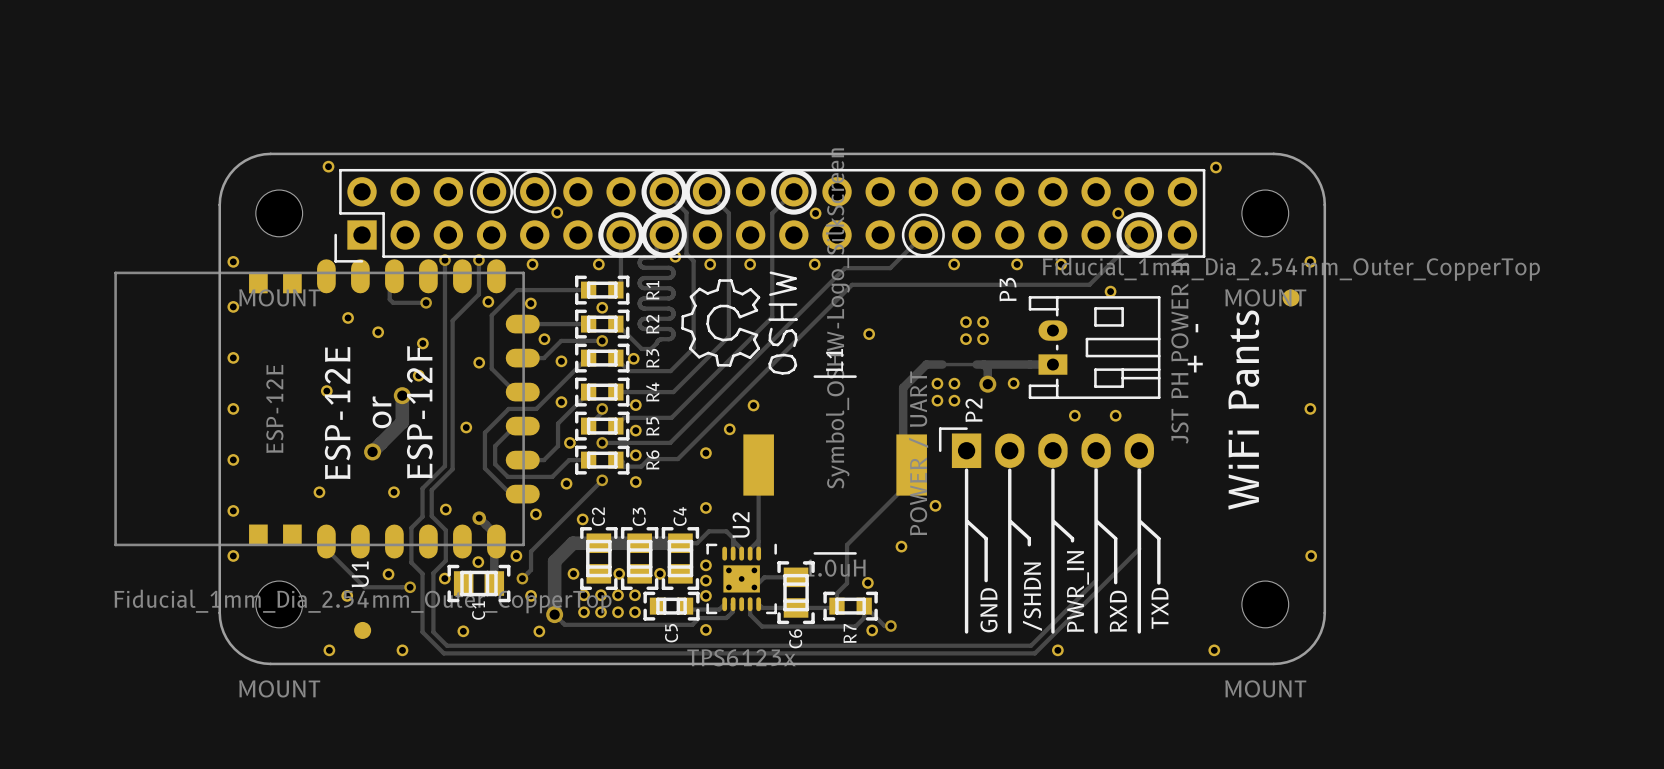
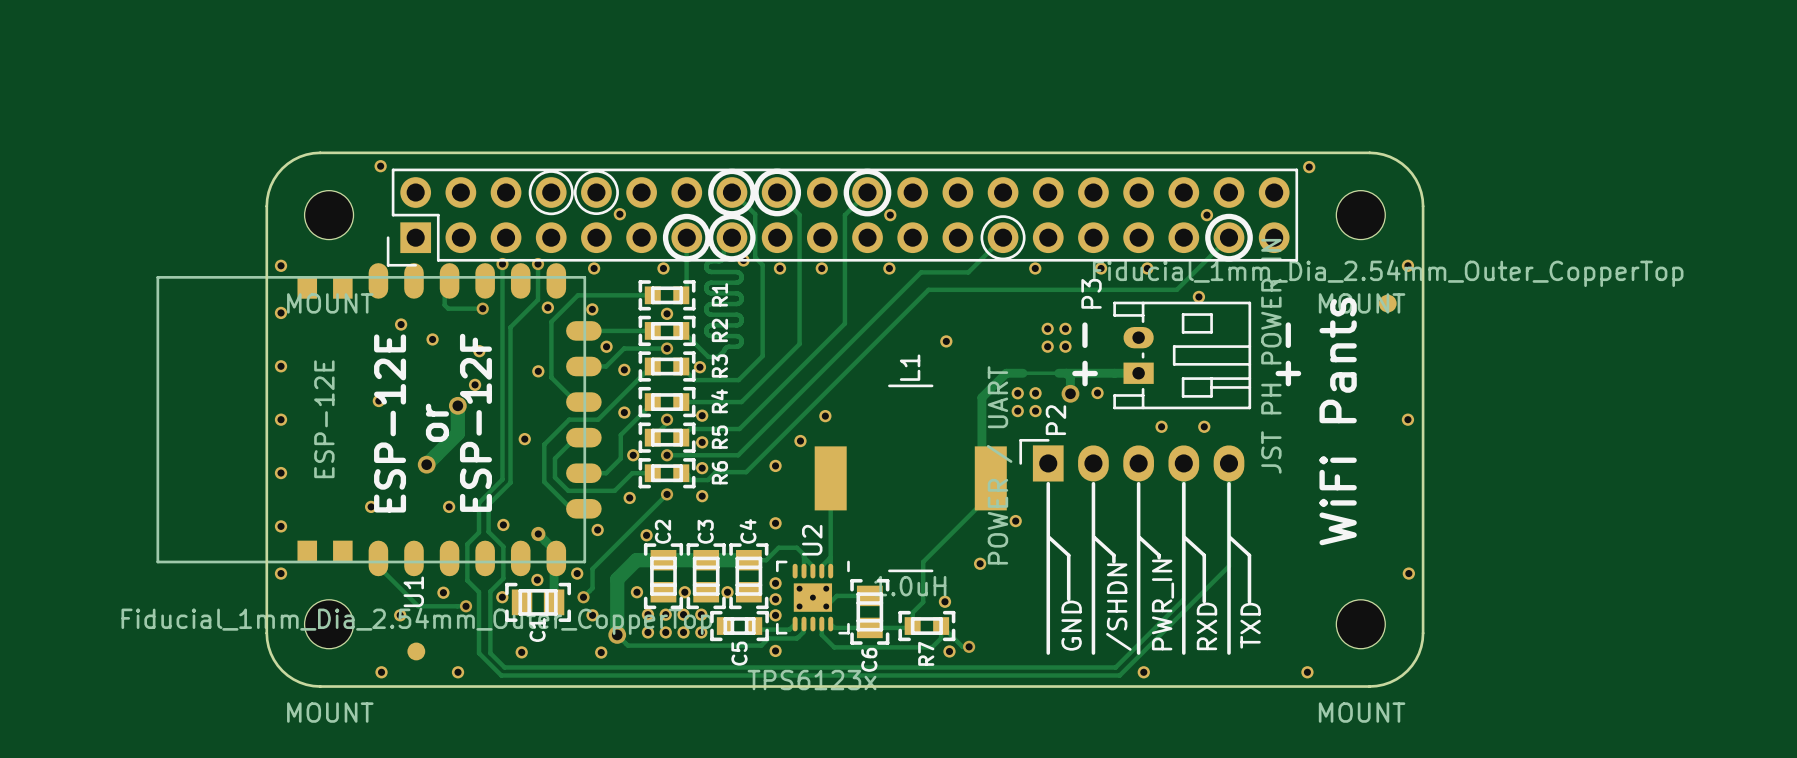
drawing: [681, 271, 798, 375] -> none
text: none -> - (1084, 335)
text: none -> + (1085, 373)

